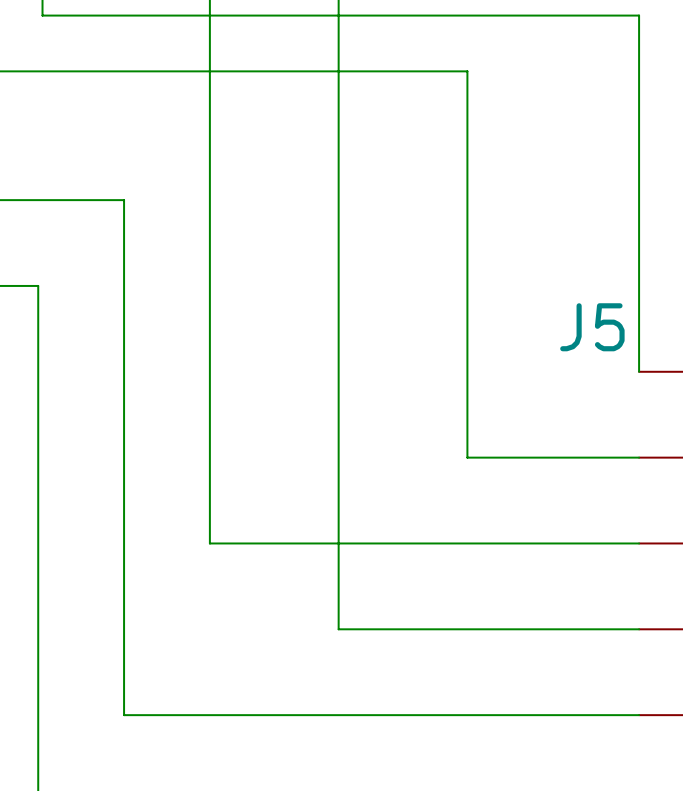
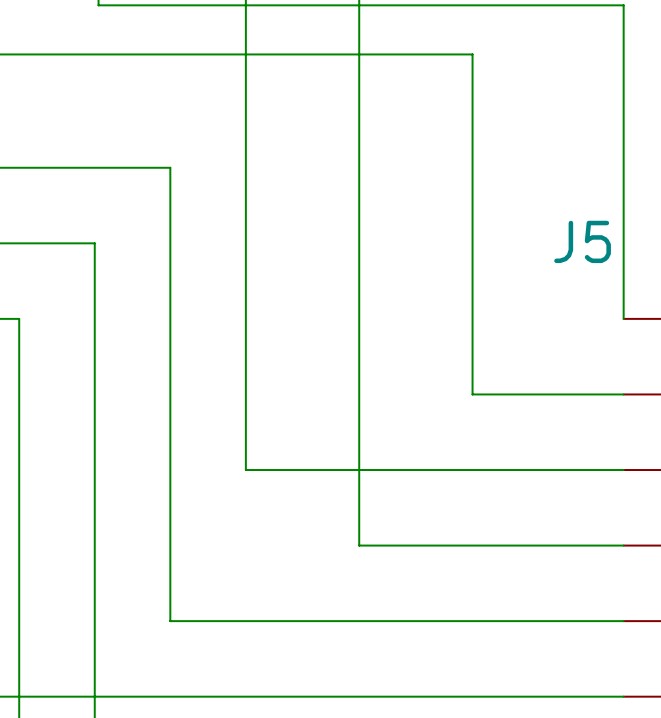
J5 name position: J5 (592, 327) -> J5 (582, 241)

